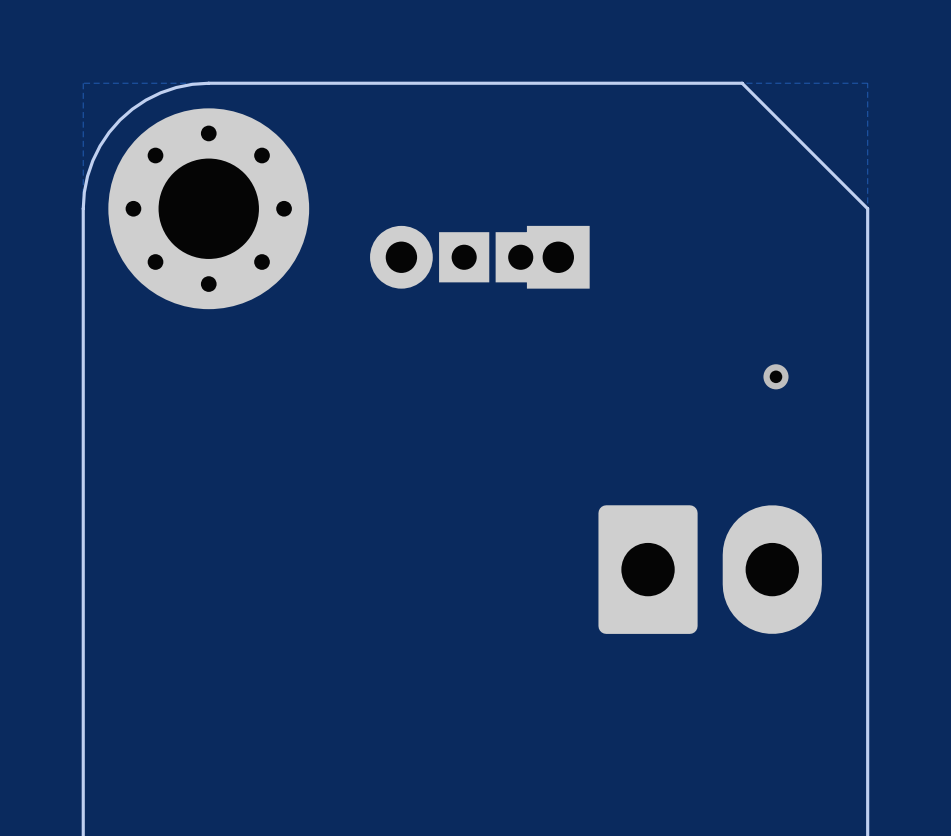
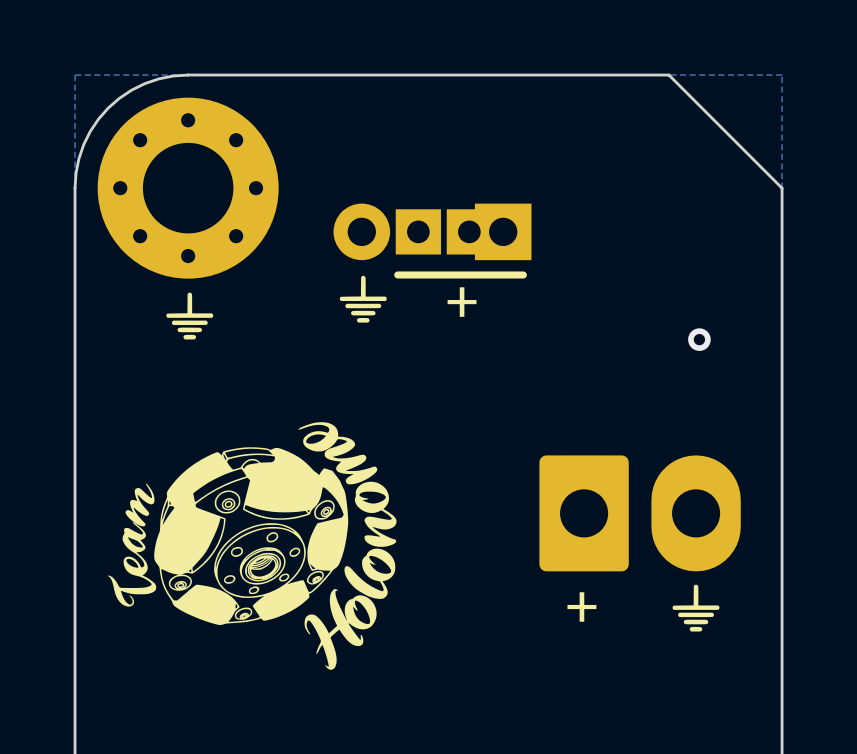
line: none -> (523, 274) (397, 274)
drawing: none -> [339, 275, 387, 323]
drawing: none -> [166, 292, 214, 340]
text: none -> + (462, 302)
drawing: none -> [107, 422, 397, 670]
drawing: none -> [672, 584, 720, 632]
text: none -> + (581, 607)

